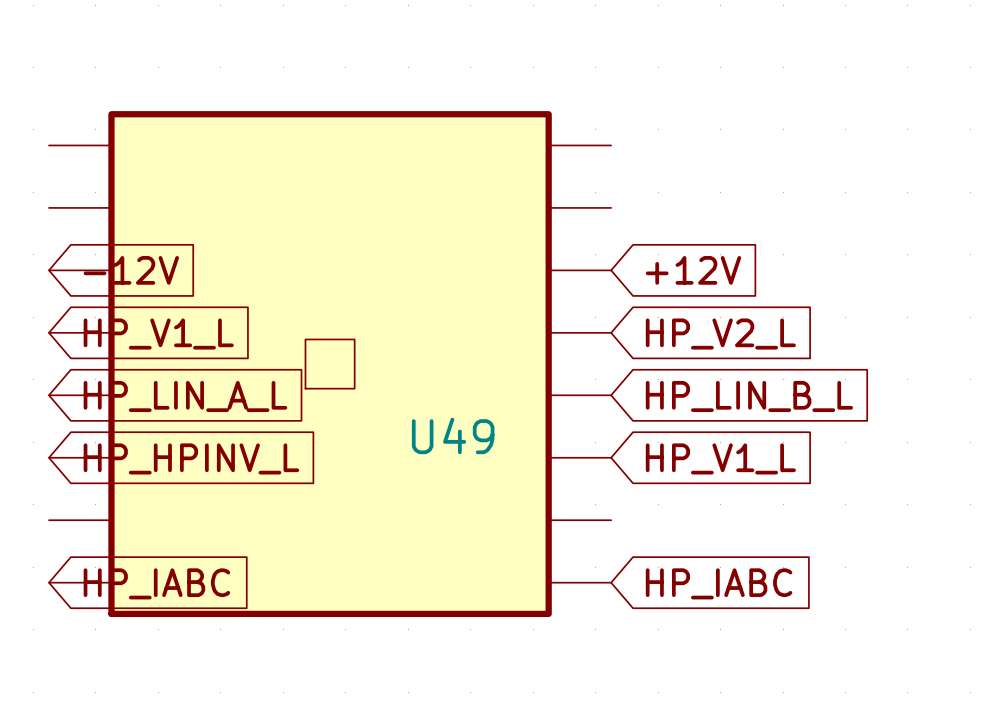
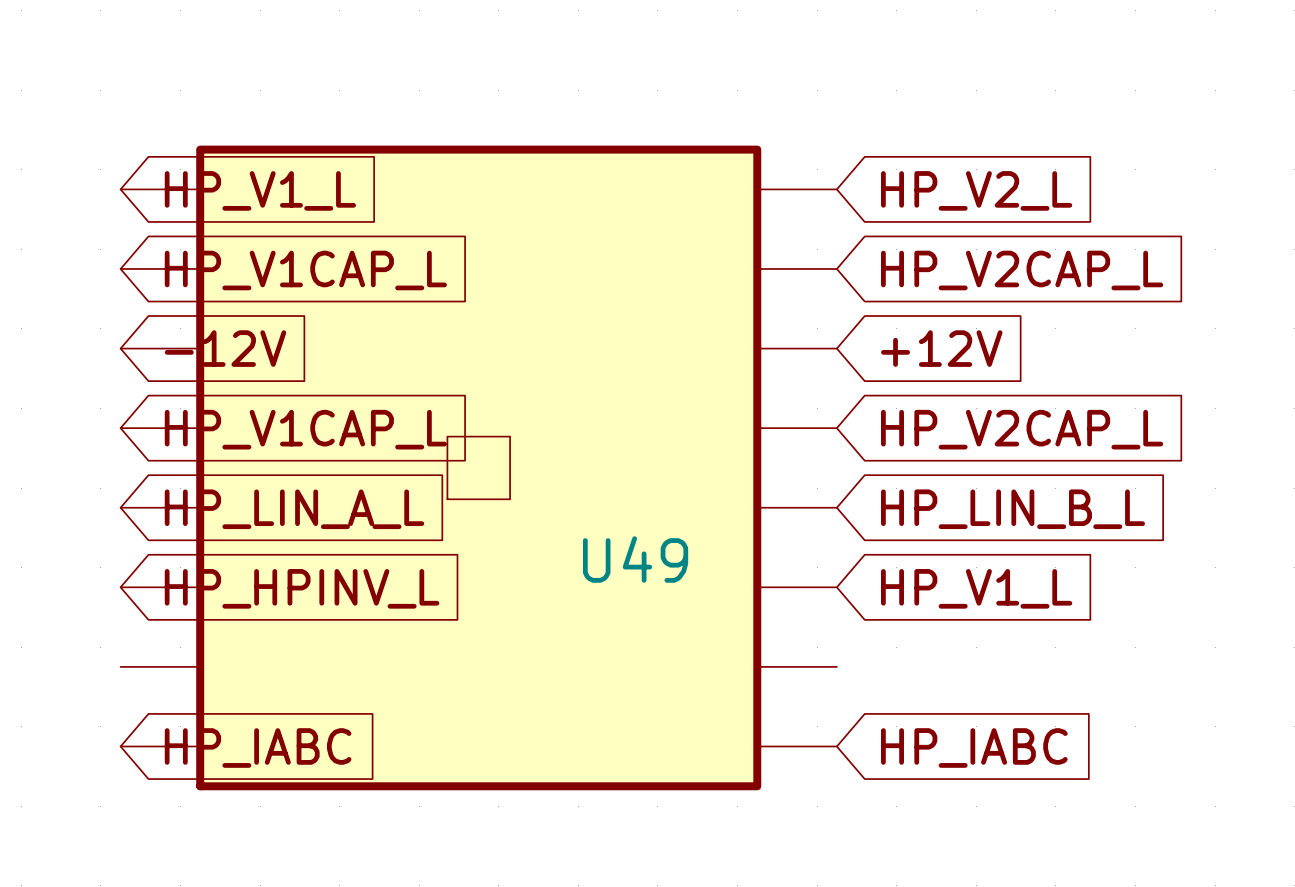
global label: none -> HP_V1_L (260, 190)
global label: none -> HP_V2_L (976, 190)
global label: none -> HP_V1CAP_L (305, 270)
global label: none -> HP_V2CAP_L (1022, 270)
global label: HP_V1_L (158, 334) -> HP_V1CAP_L (305, 429)
global label: HP_V2_L (720, 334) -> HP_V2CAP_L (1022, 429)

